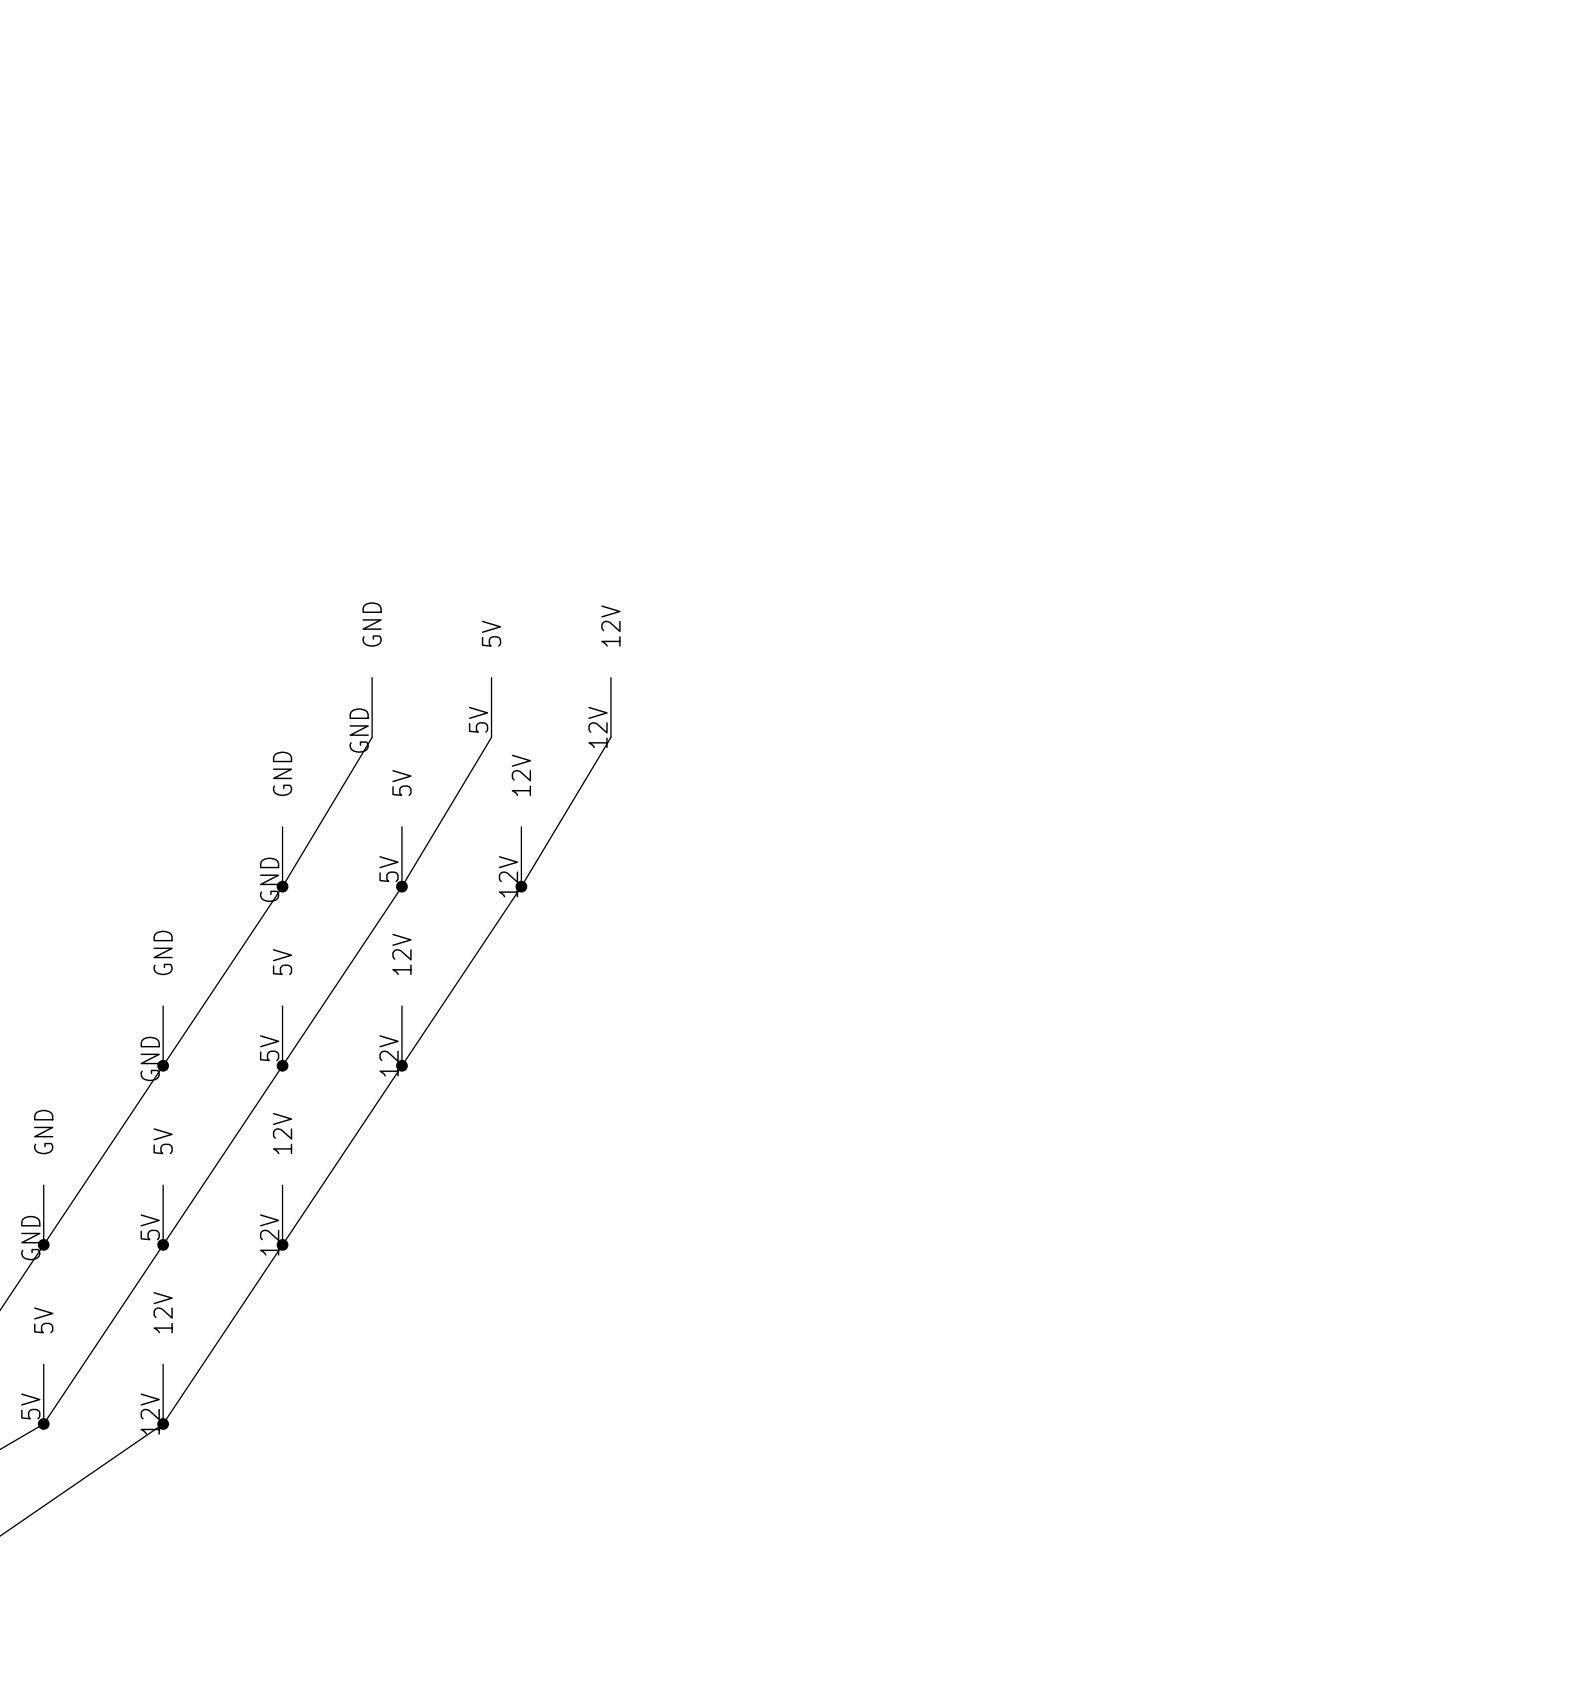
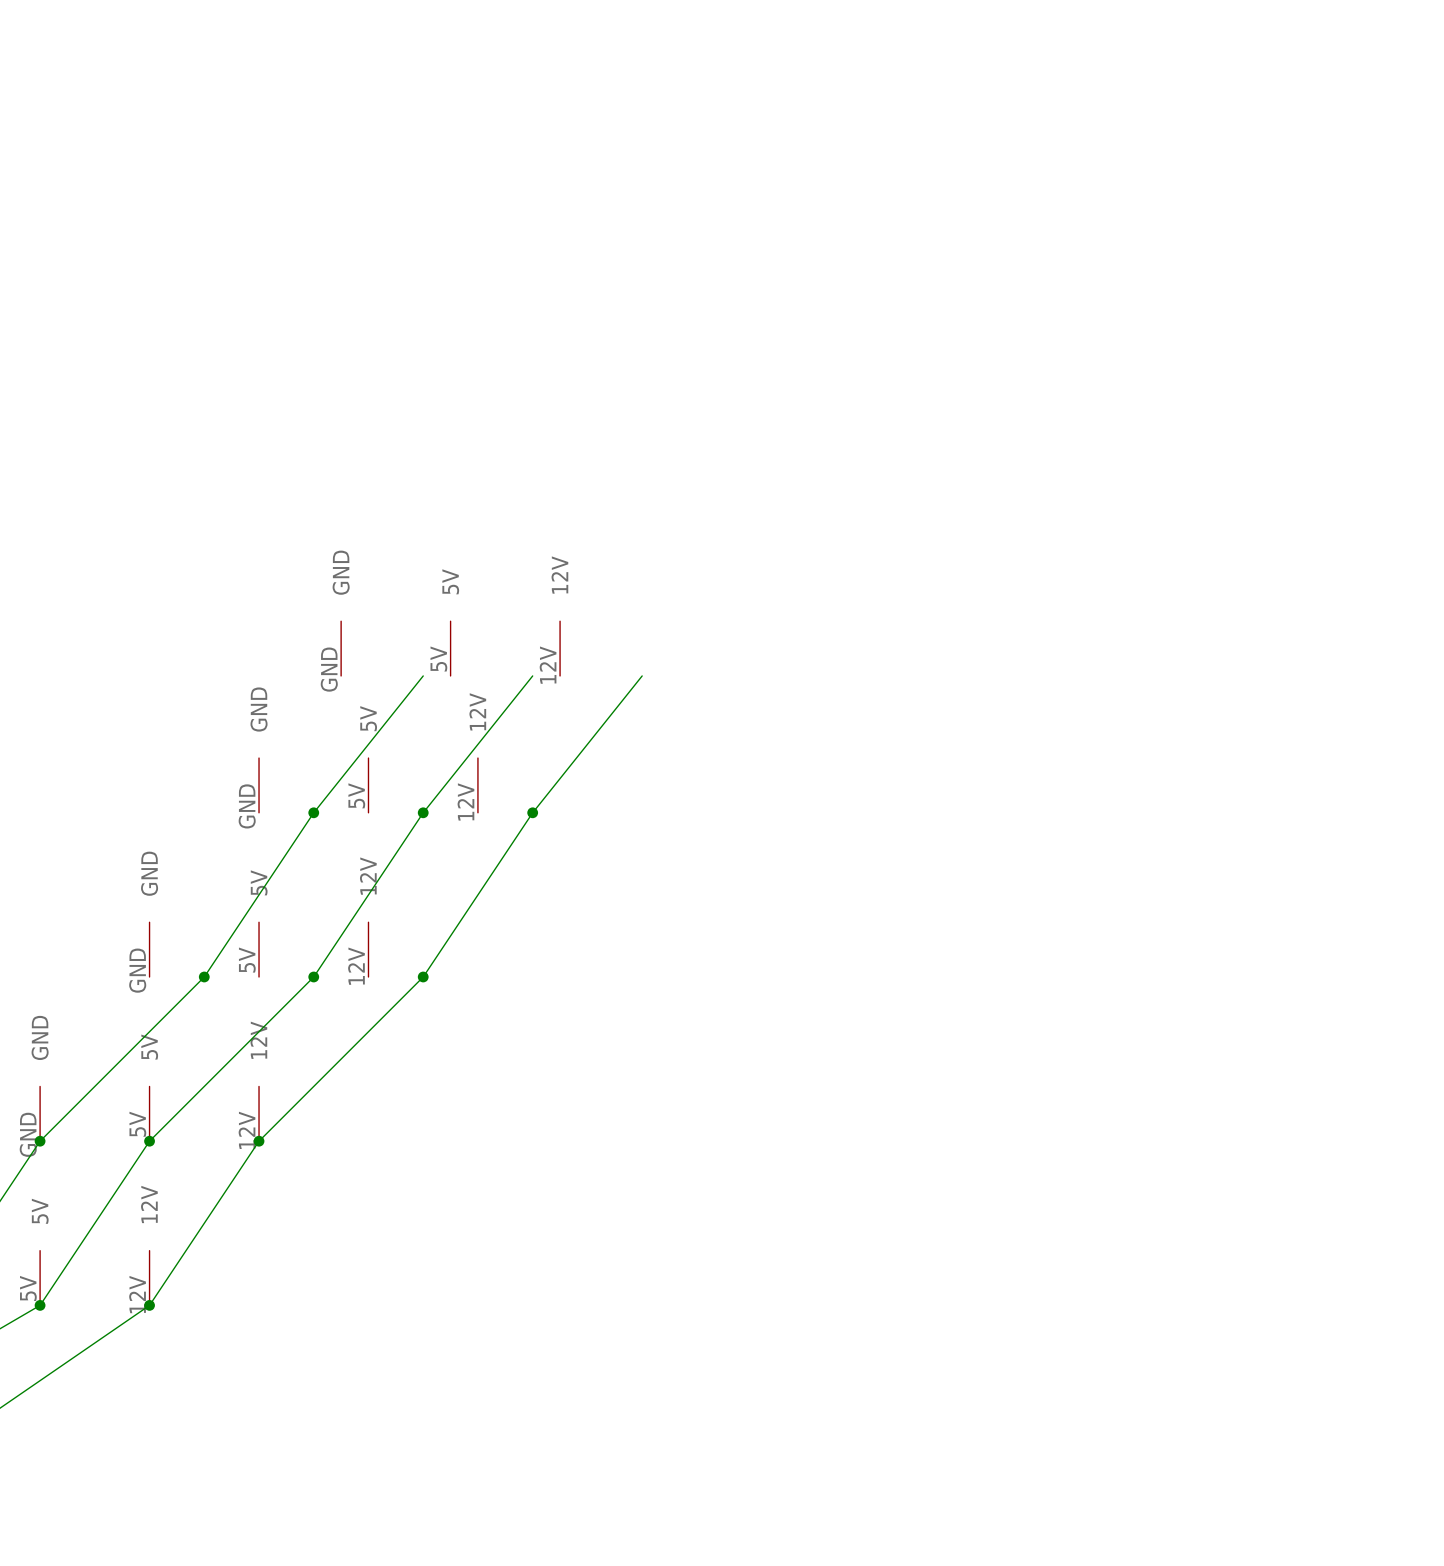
wire: (372, 737) (282, 886) (43, 1244) -> (423, 675) (313, 812) (204, 976) (40, 1141)
wire: (491, 737) (401, 886) (163, 1244) -> (532, 675) (423, 812) (313, 976) (149, 1141)
wire: (610, 737) (521, 886) (282, 1244) -> (642, 675) (532, 812) (423, 976) (259, 1141)
junction: (282, 886) -> none
junction: none -> (313, 812)
junction: (401, 886) -> none
junction: none -> (423, 812)
junction: (521, 886) -> none
junction: none -> (532, 812)
junction: (163, 1065) -> none
junction: none -> (204, 976)
junction: (282, 1065) -> none
junction: none -> (313, 976)
junction: (401, 1065) -> none
junction: none -> (423, 976)

